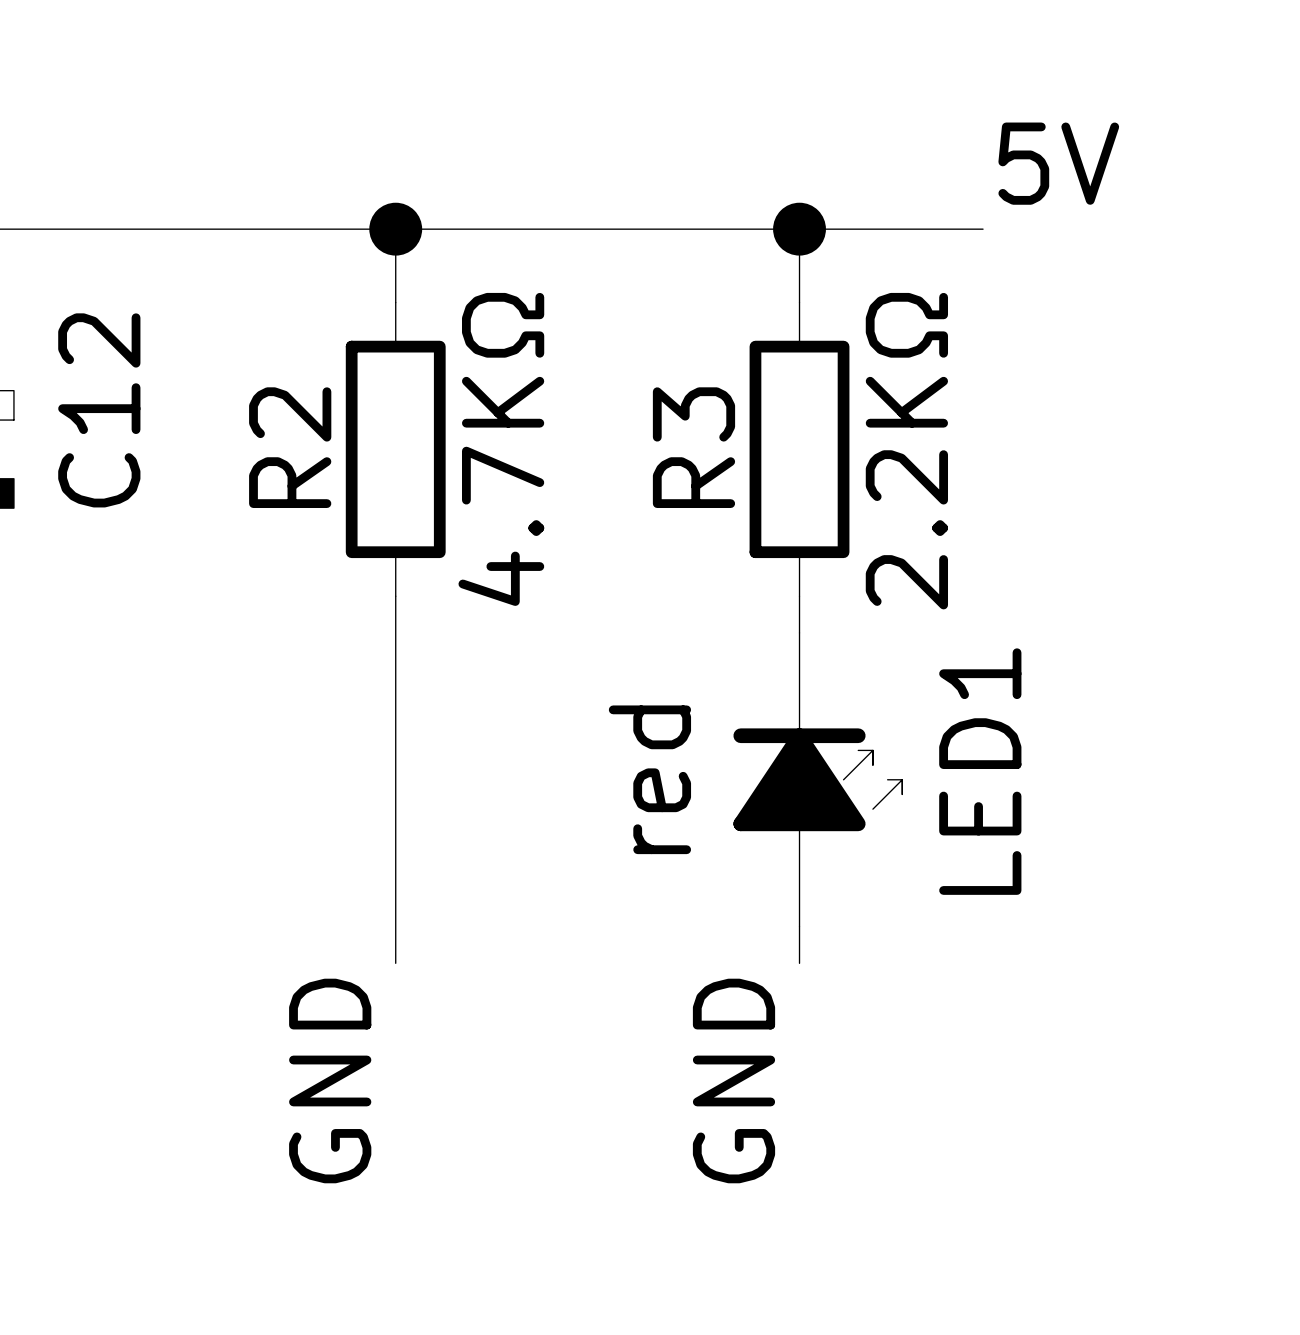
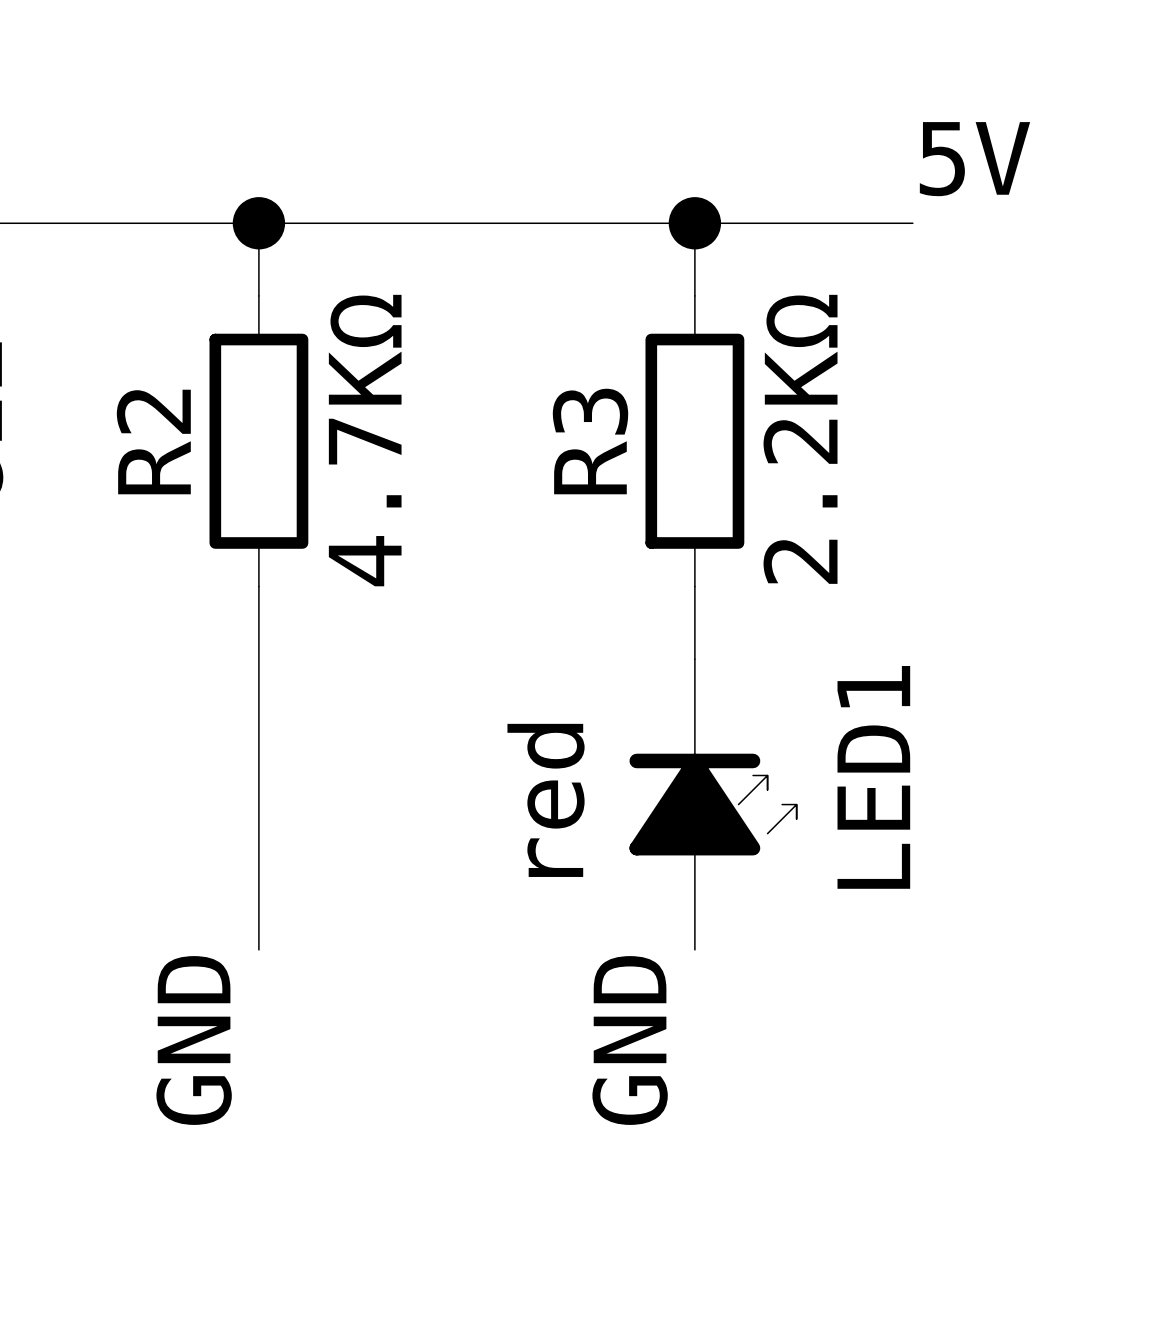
label position: 5V (1058, 163) -> 5V (974, 159)
wire: (799, 229) (799, 302) -> (694, 223) (694, 295)
junction position: (799, 229) -> (694, 223)
wire: none -> (840, 223) (912, 223)
R3 position: (799, 449) -> (694, 441)
wire: (799, 596) (799, 632) -> none
wire: none -> (694, 586) (694, 659)
LED1 position: (817, 779) -> (713, 804)
wire: (799, 926) (799, 963) -> none
label position: GND (734, 1080) -> GND (630, 1040)

